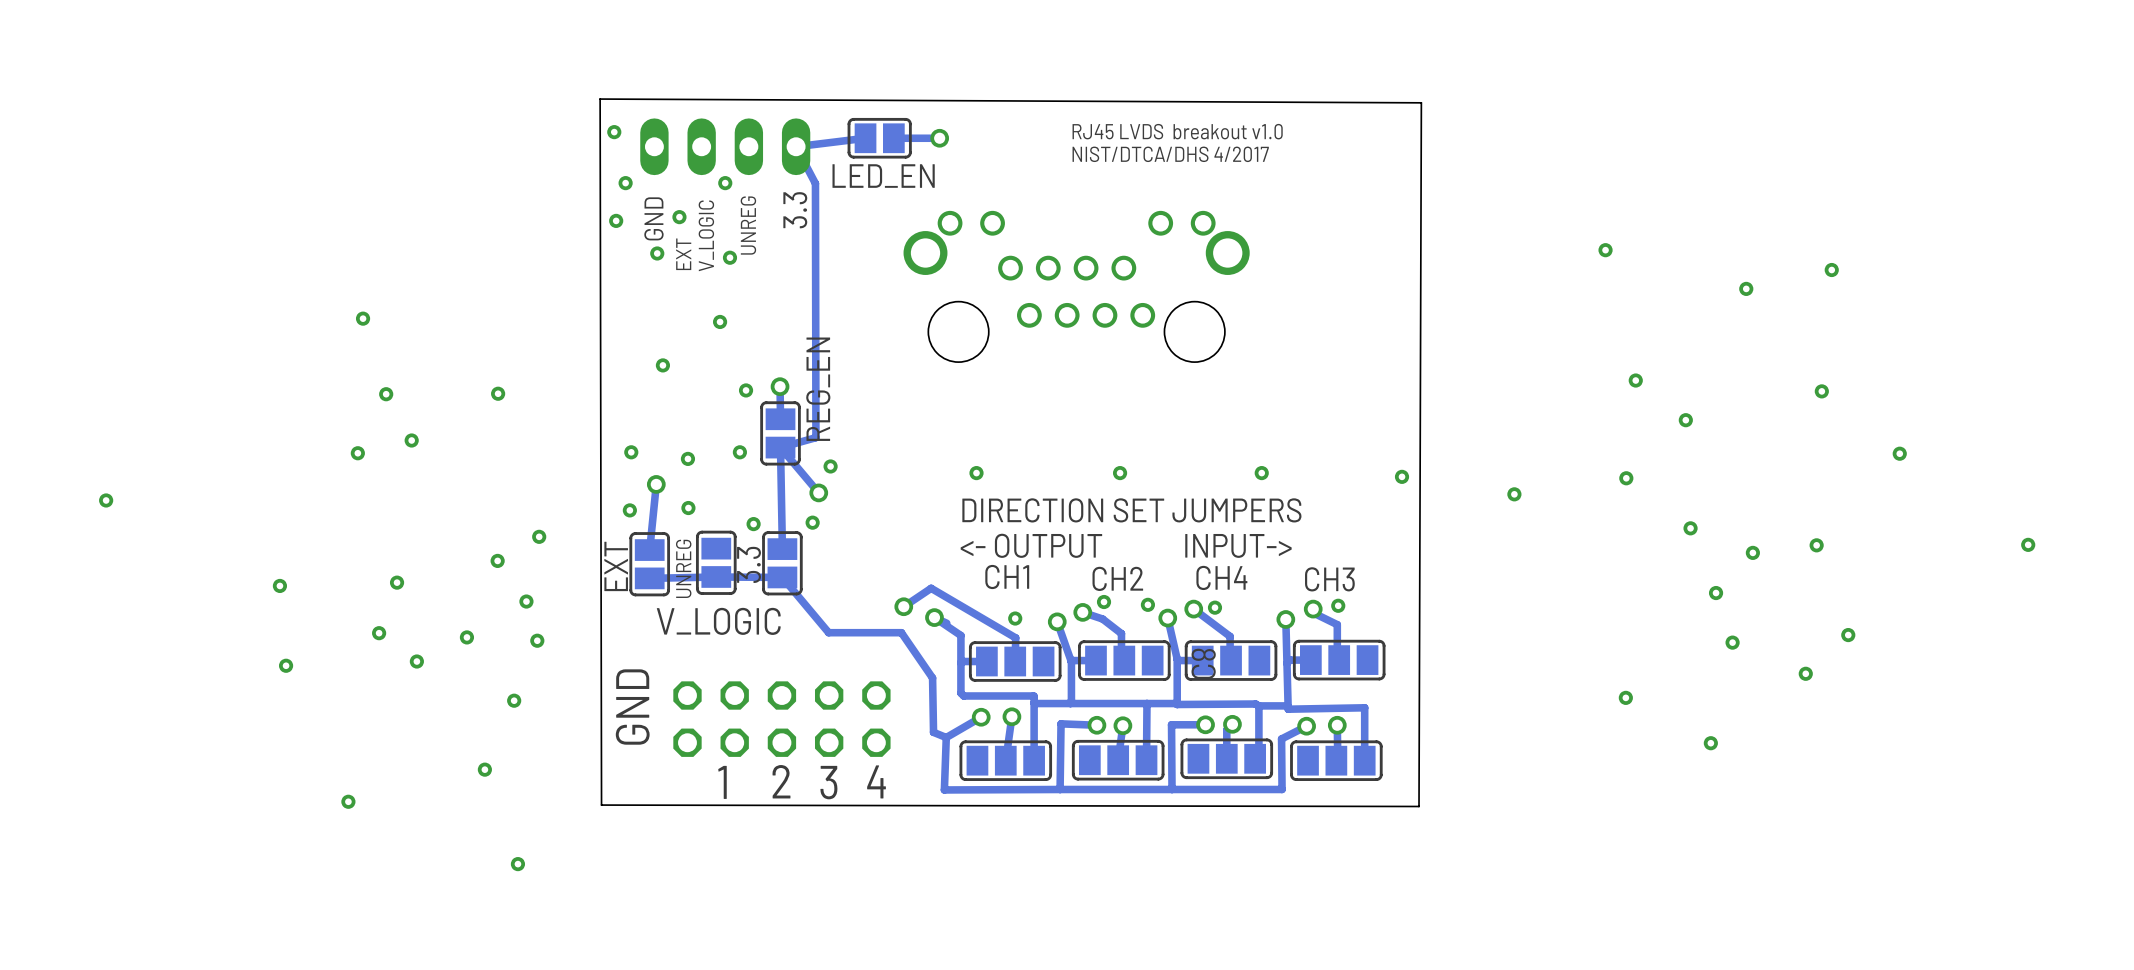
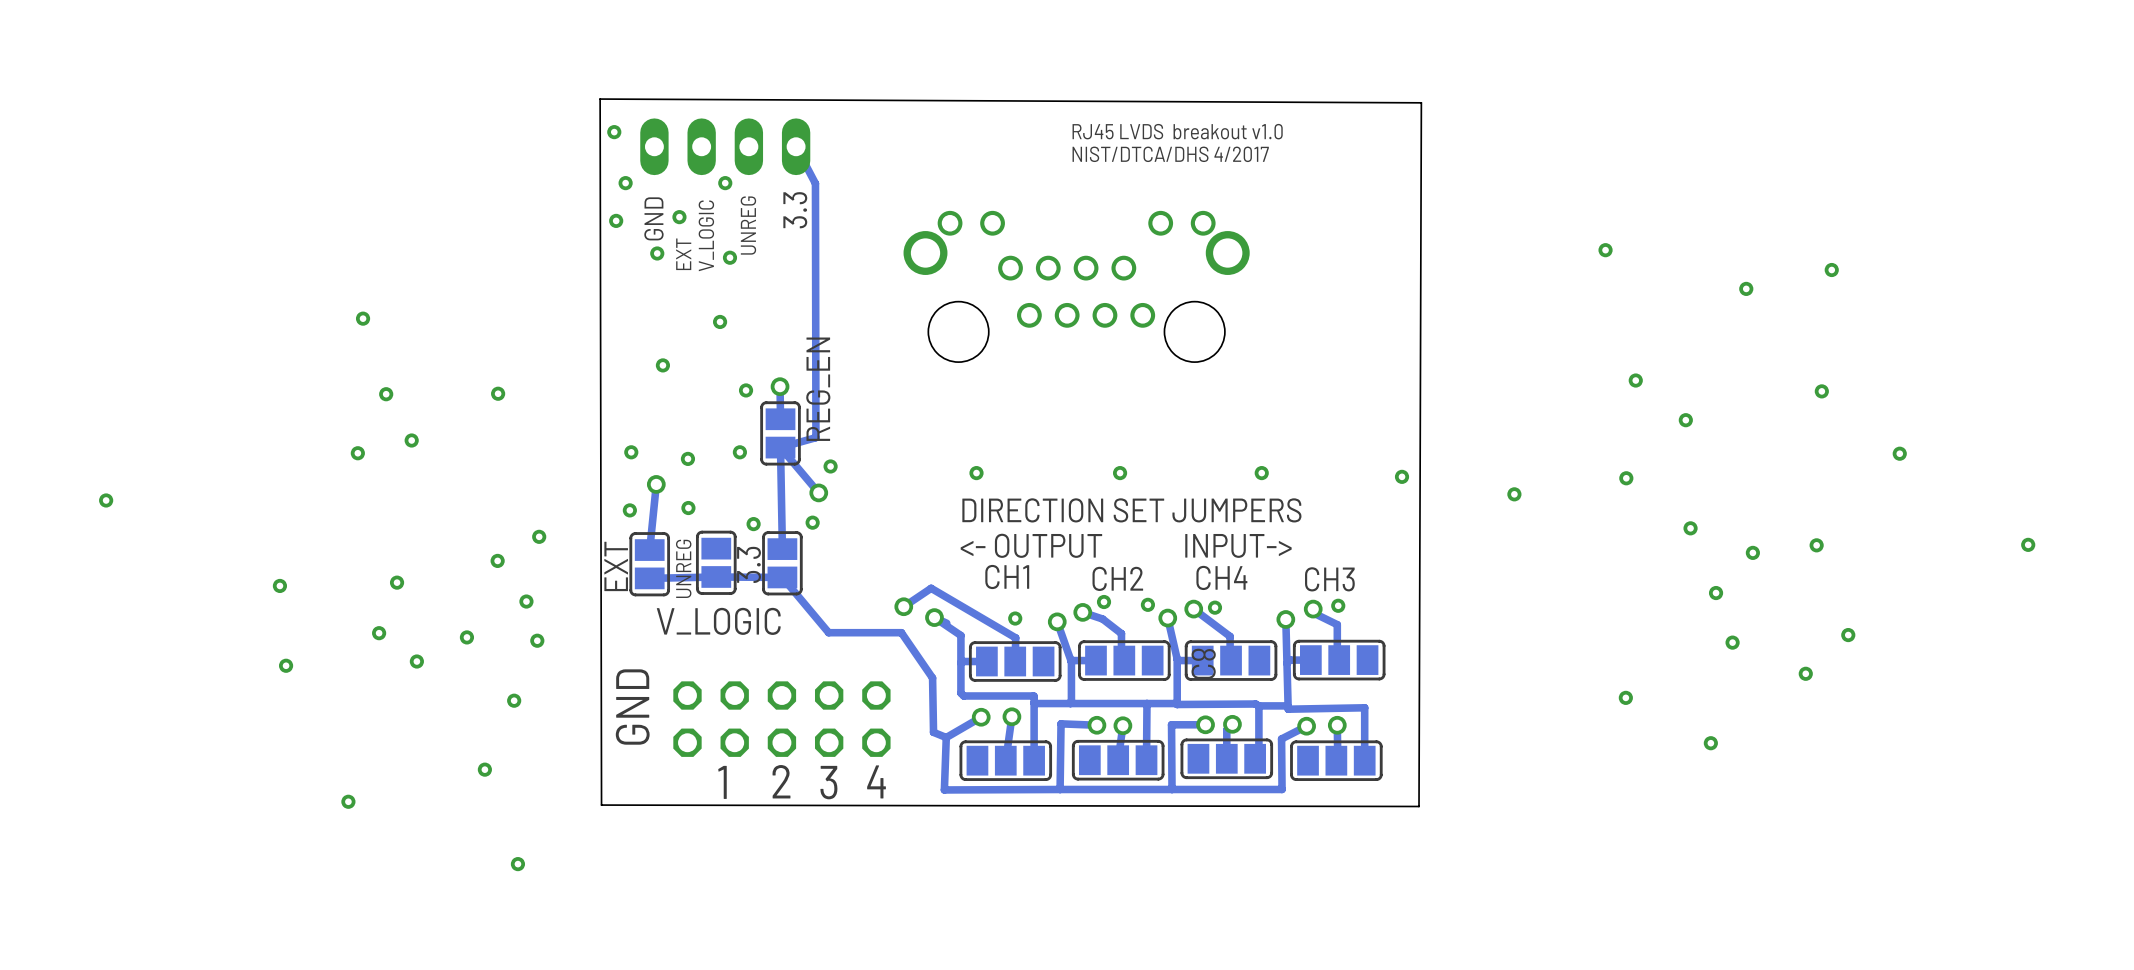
track: (865, 138) (796, 146) -> none
part: (879, 138) -> none
track: (939, 138) (893, 138) -> none
via: (939, 138) -> none
text: LED_EN (883, 176) -> none

